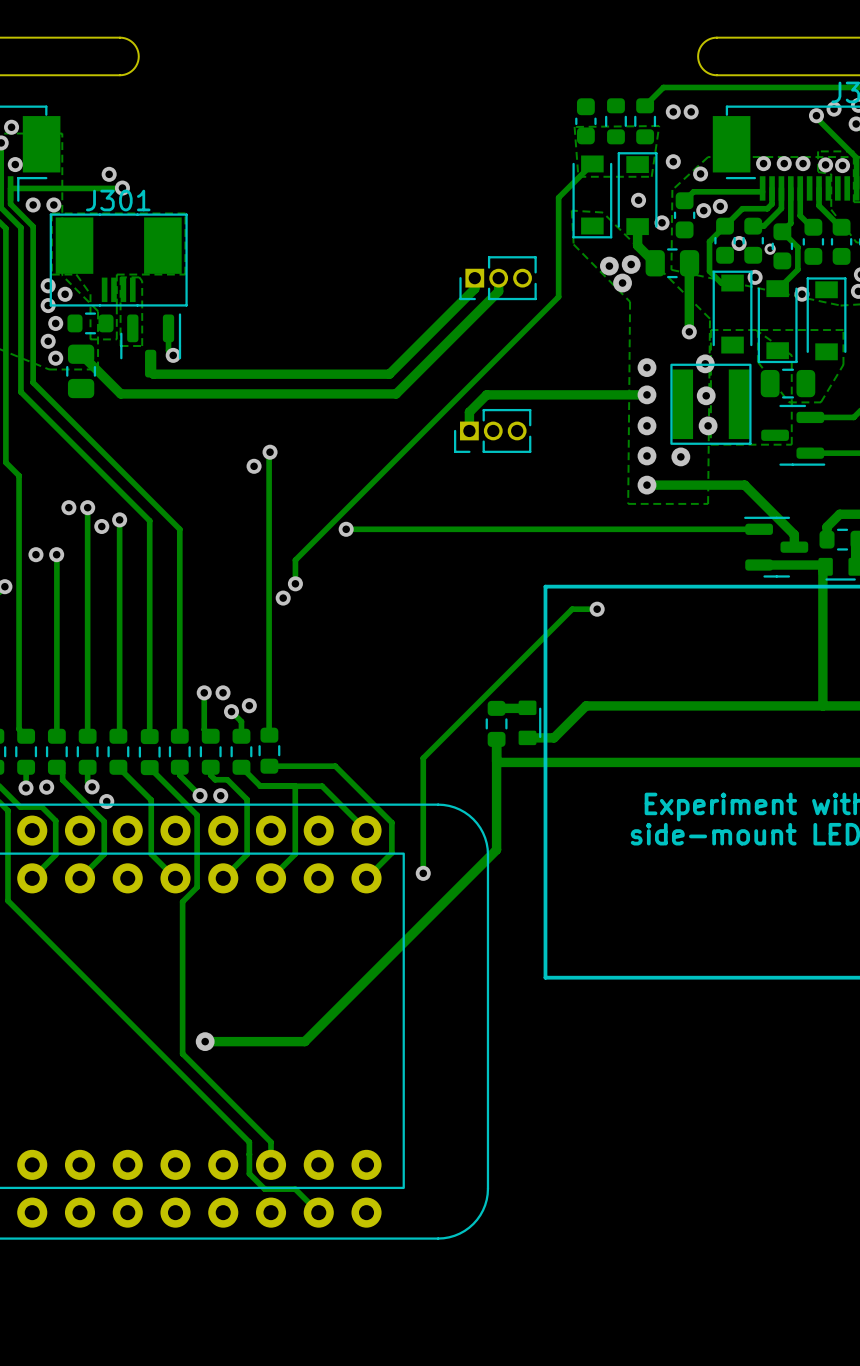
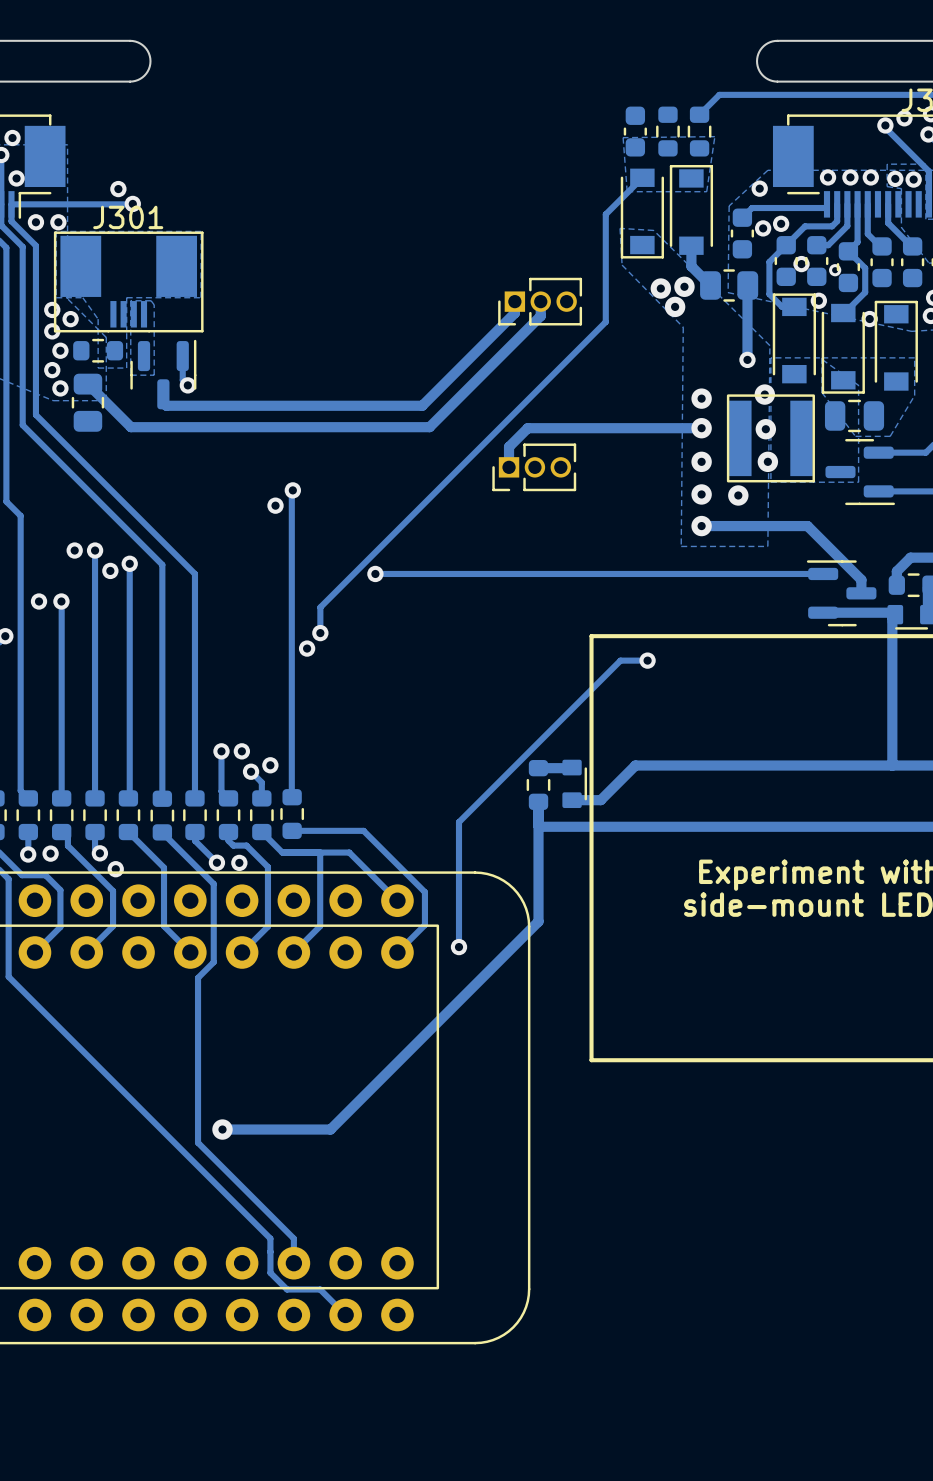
via: (673, 111) -> none
via: (691, 111) -> none
via: (673, 161) -> none
via: (638, 200) -> none
via: (662, 222) -> none

